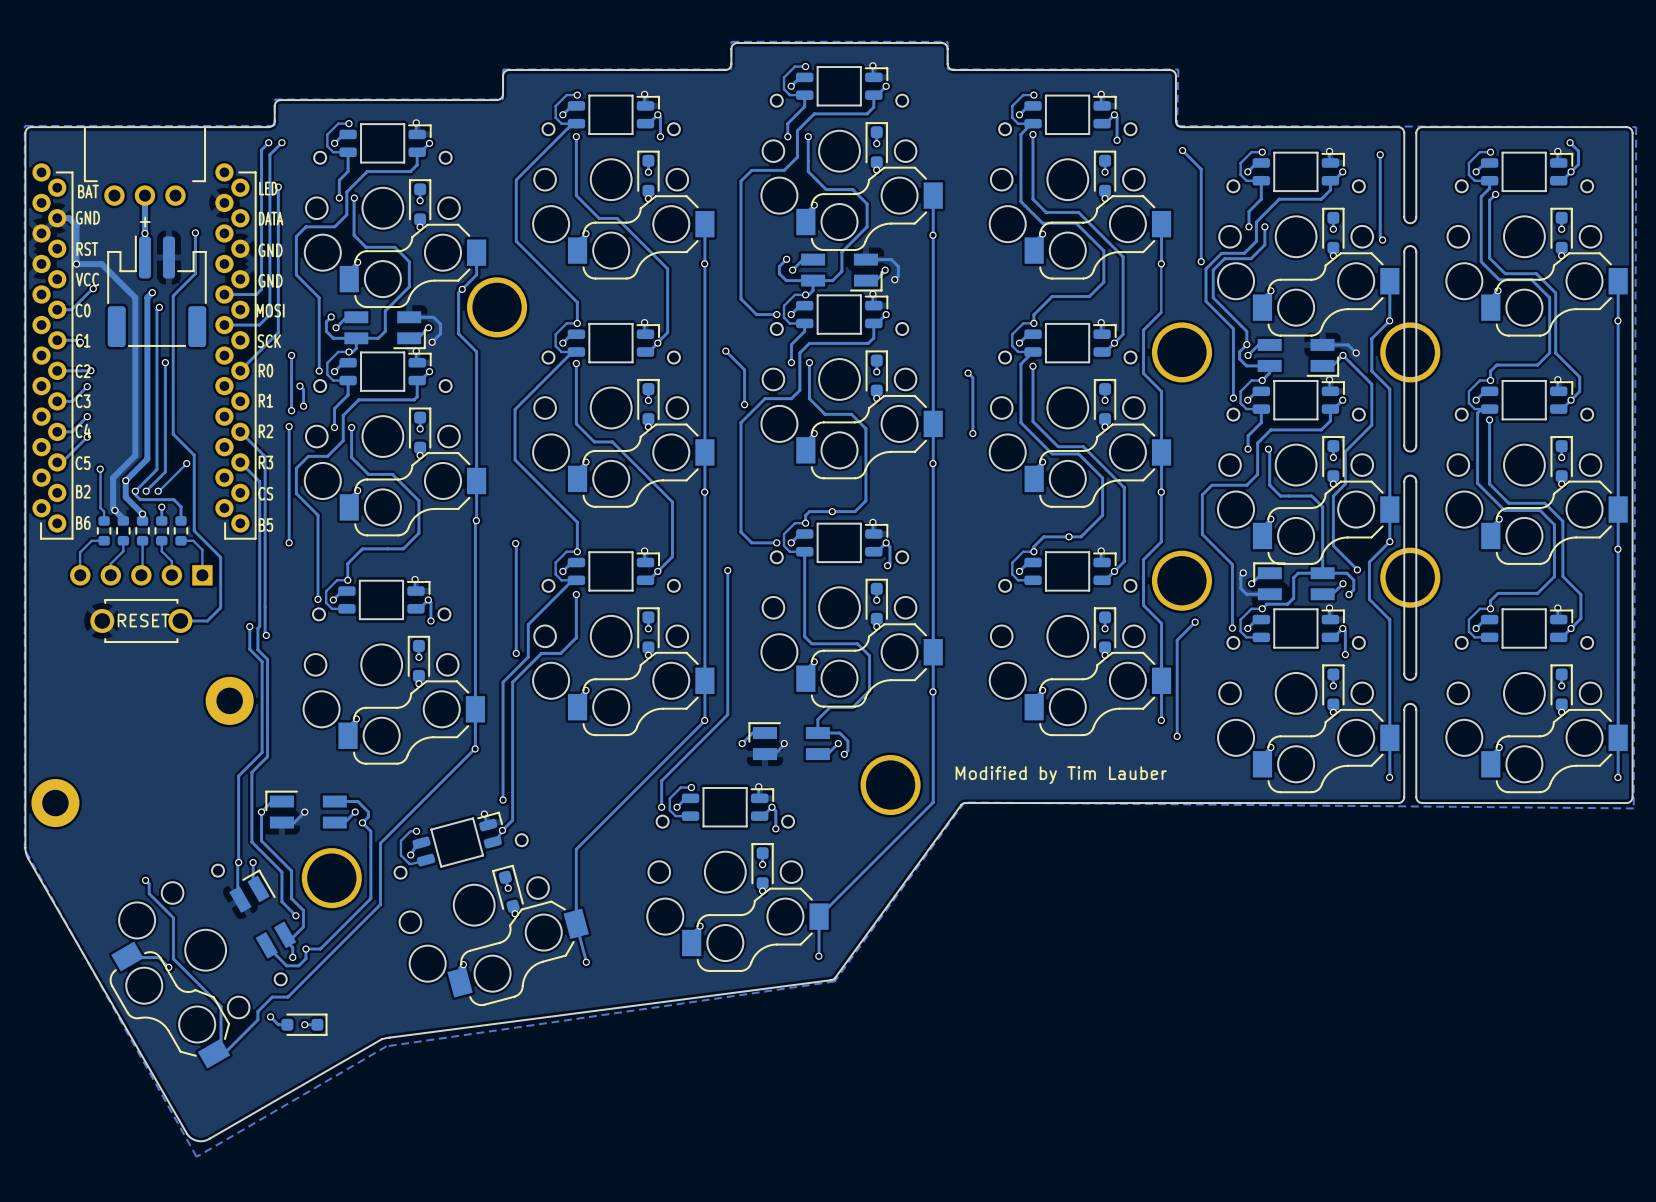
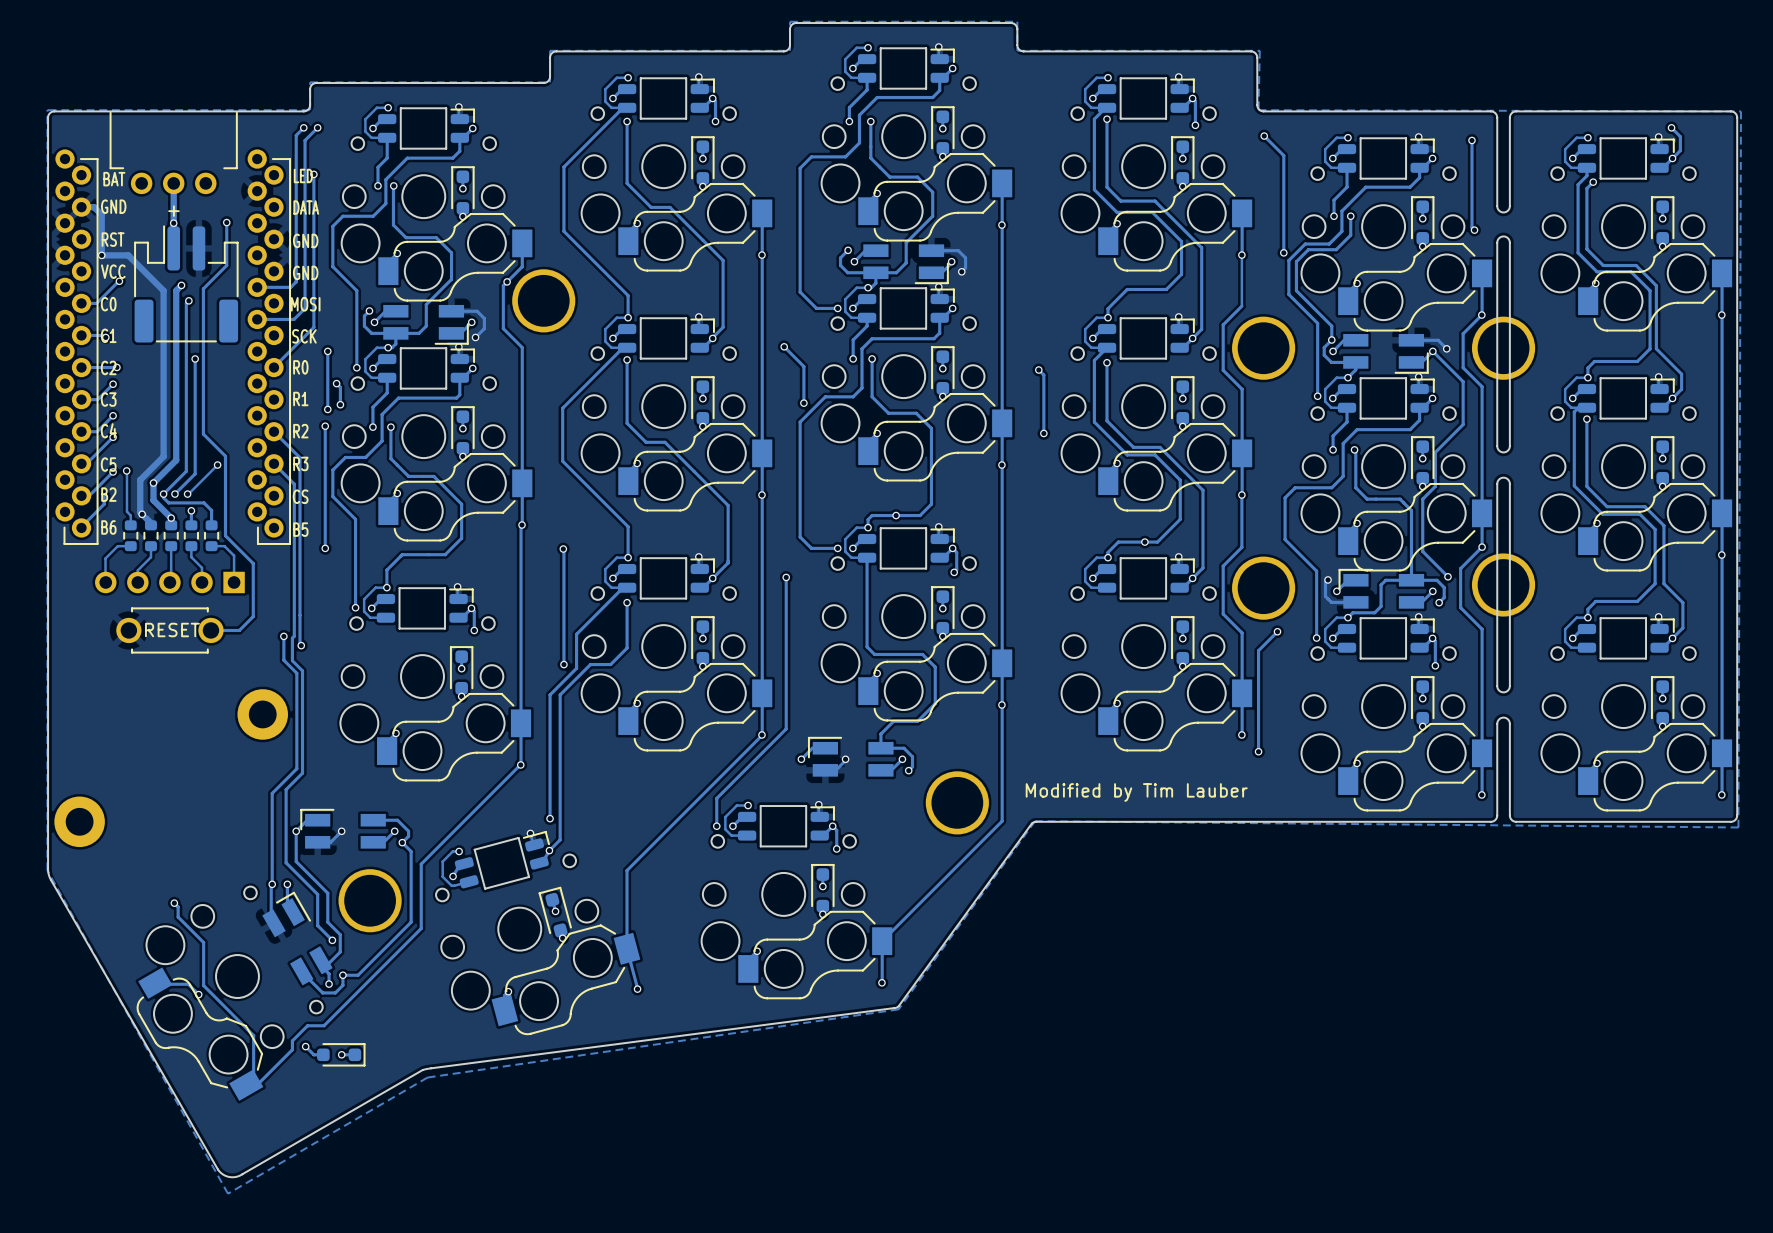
track: none -> (113, 471) (89, 495)
via: none -> (113, 471)
track: none -> (104, 496) (104, 504) (81, 526)

